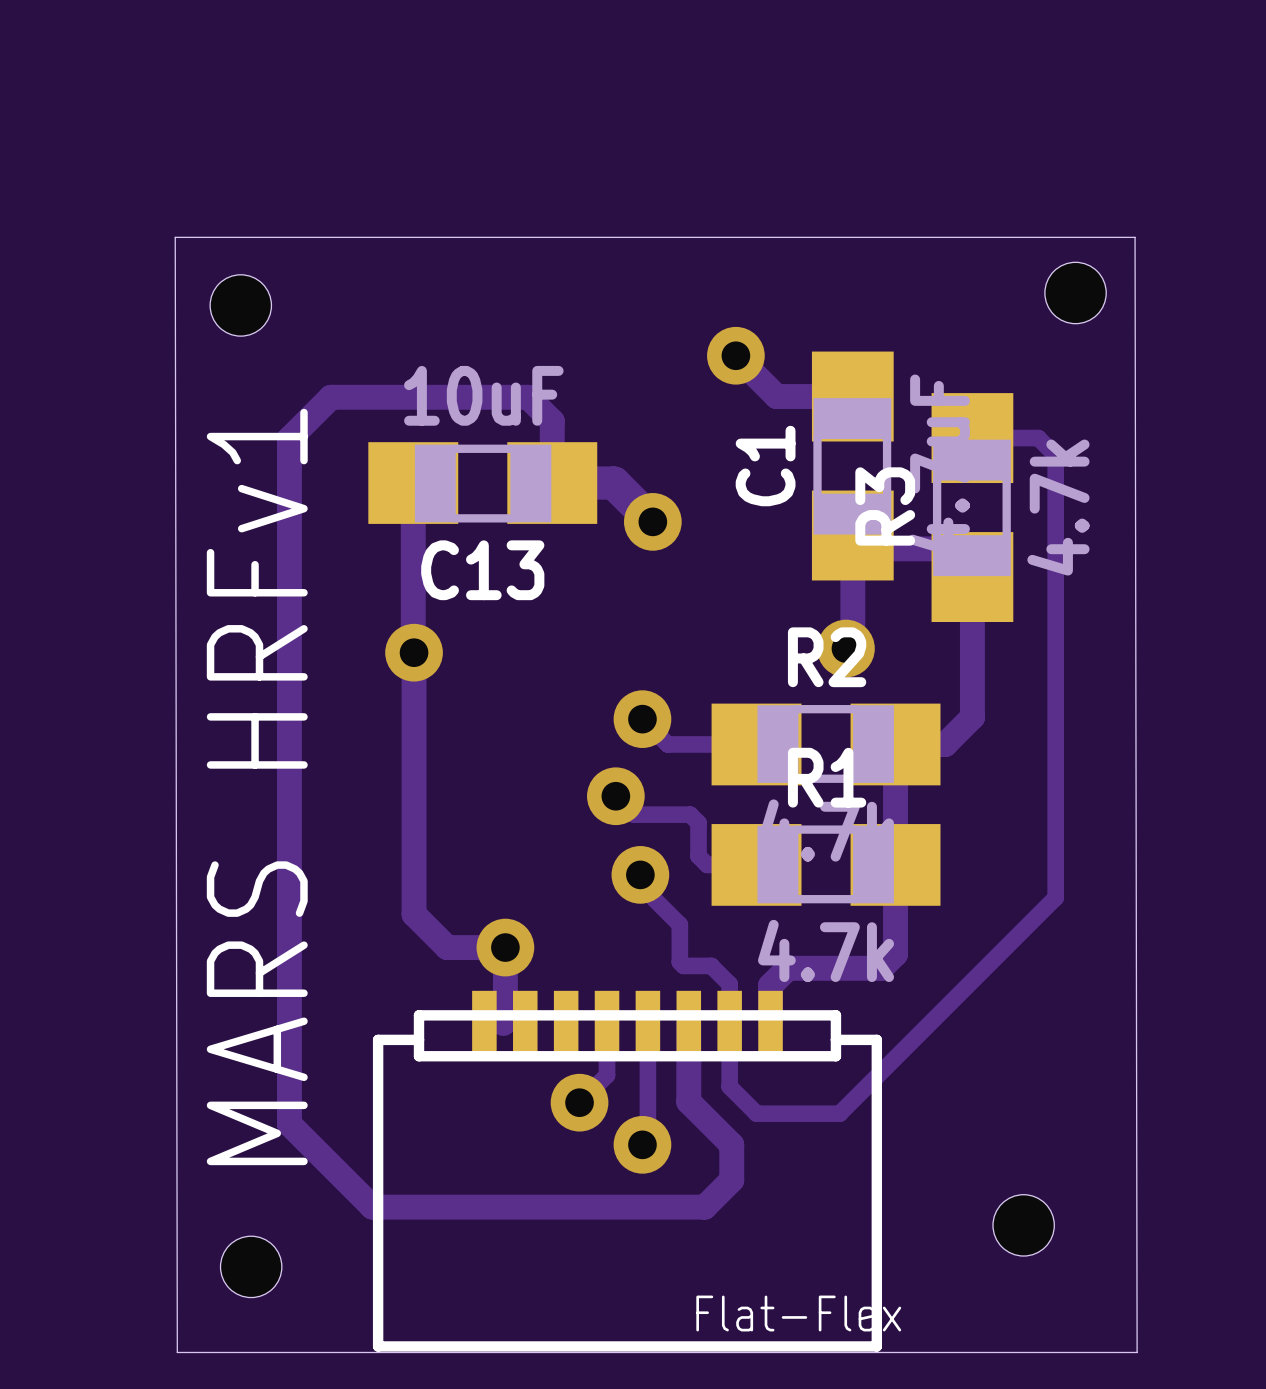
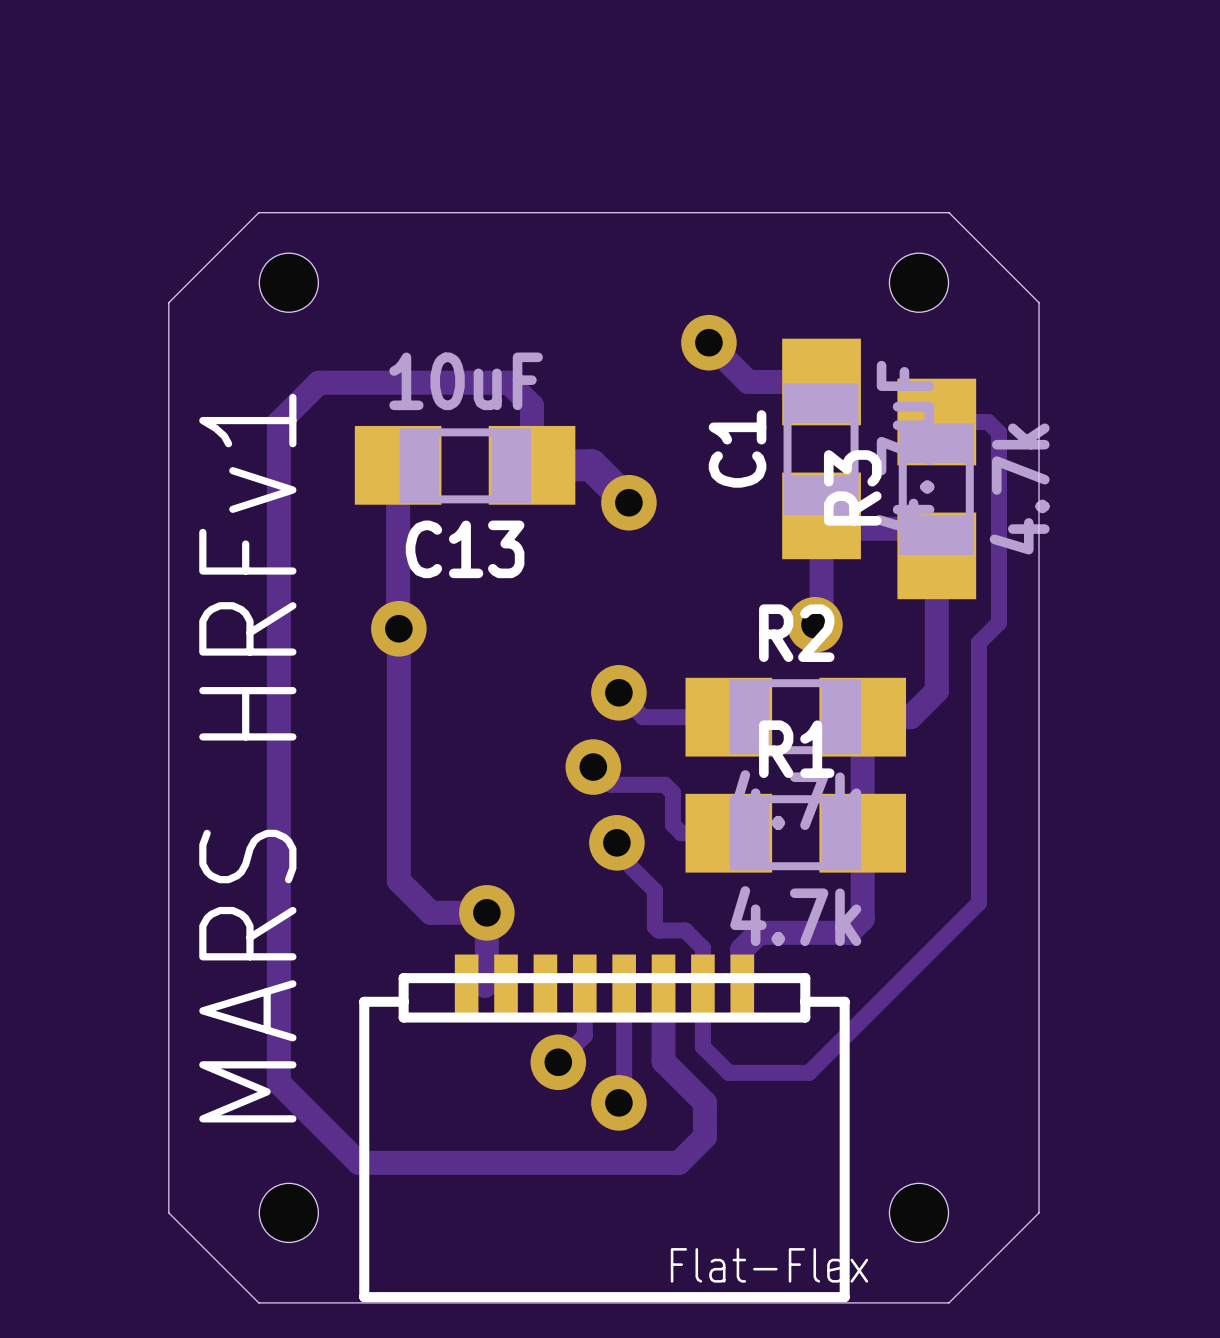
hole position: (1075, 293) -> (918, 282)
hole position: (240, 305) -> (288, 282)
track: (1025, 438) (1038, 438) (1055, 455) (1055, 897) (1016, 937) -> (988, 422) (999, 432) (999, 622) (978, 642) (978, 902)
hole position: (1023, 1225) -> (918, 1212)
hole position: (251, 1266) -> (288, 1212)
board edge: (268, 1352) (177, 1352) (175, 237) (1135, 237) (1137, 1352) (985, 1352) -> (258, 1302) (168, 1212) (168, 302) (258, 212) (948, 212) (1039, 302) (1039, 1212) (948, 1302)

